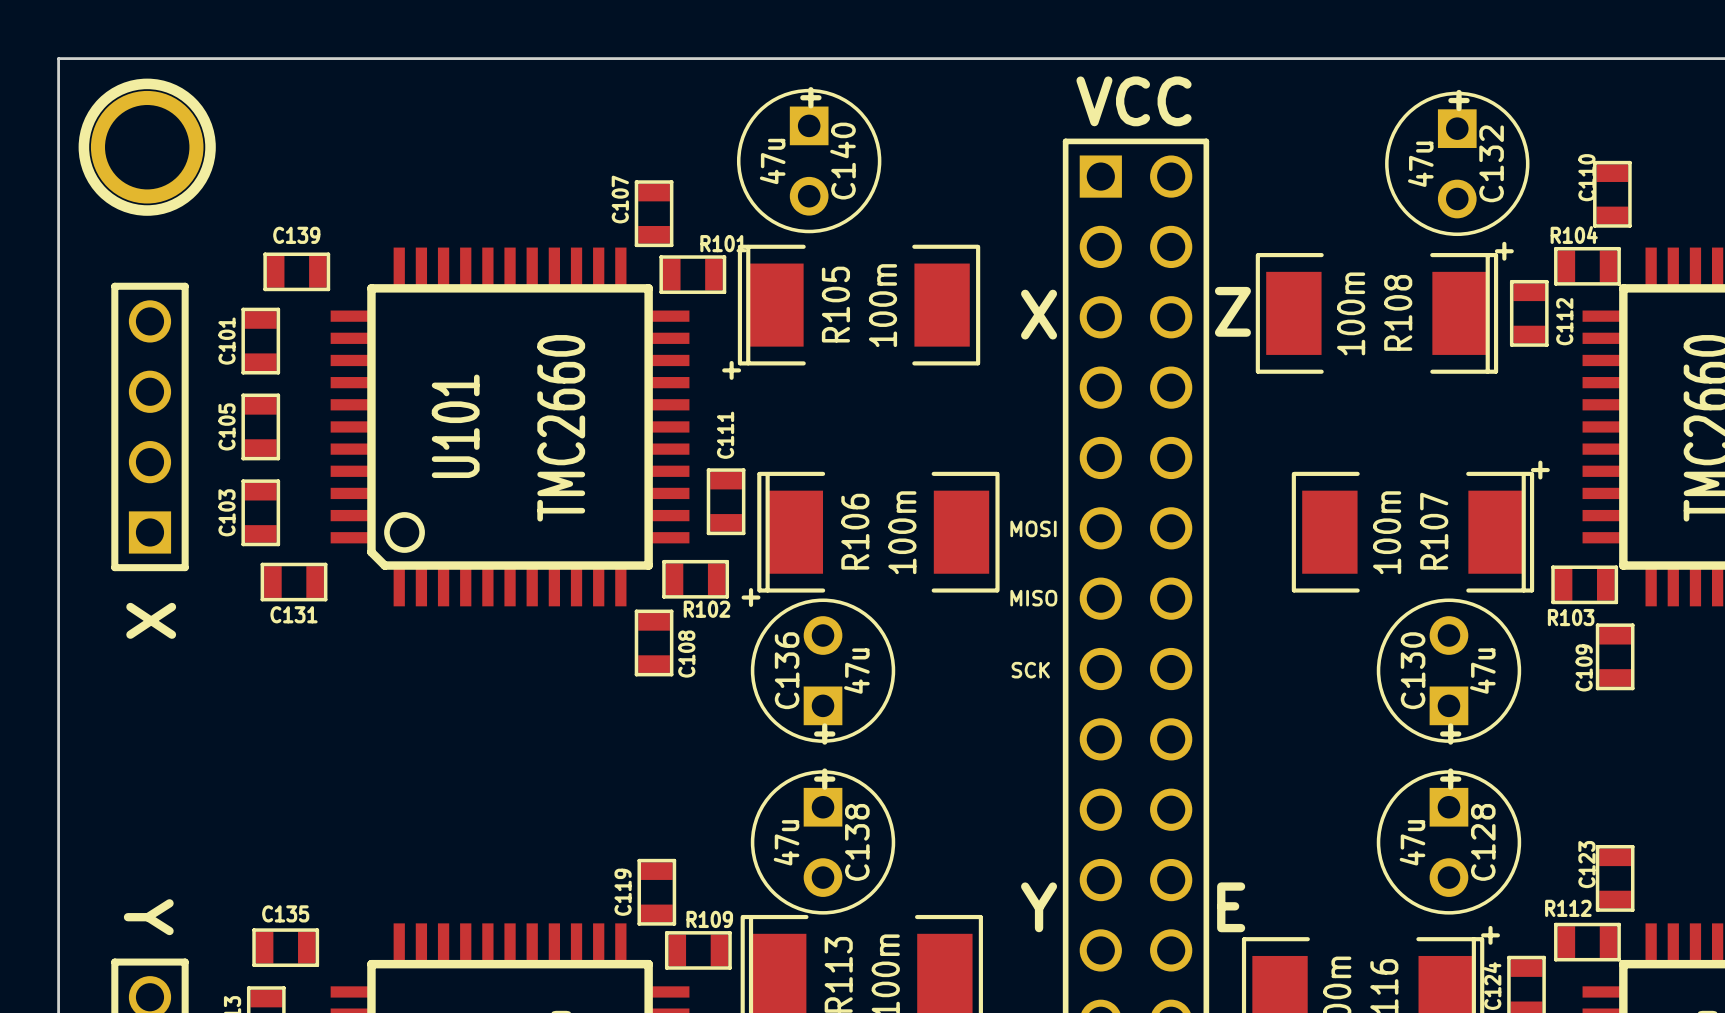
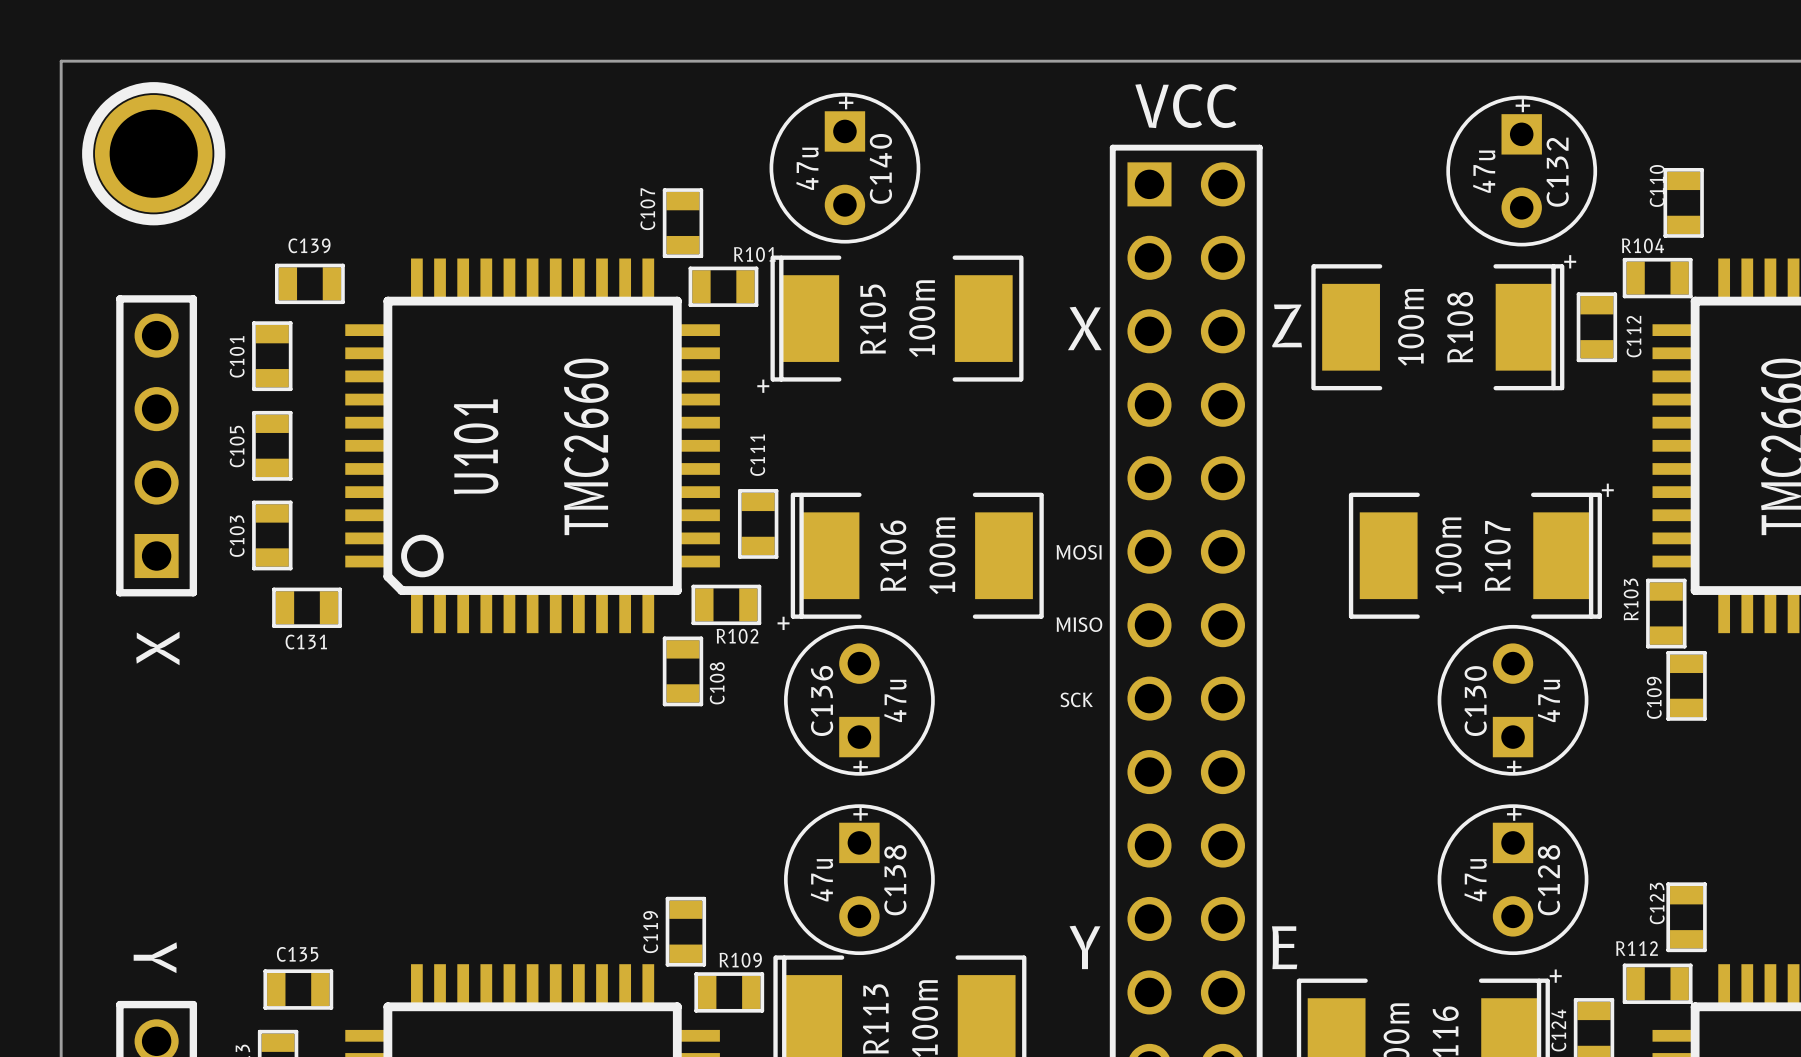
R103 rotation: 0° (1584, 584) -> 90° clockwise (1666, 613)

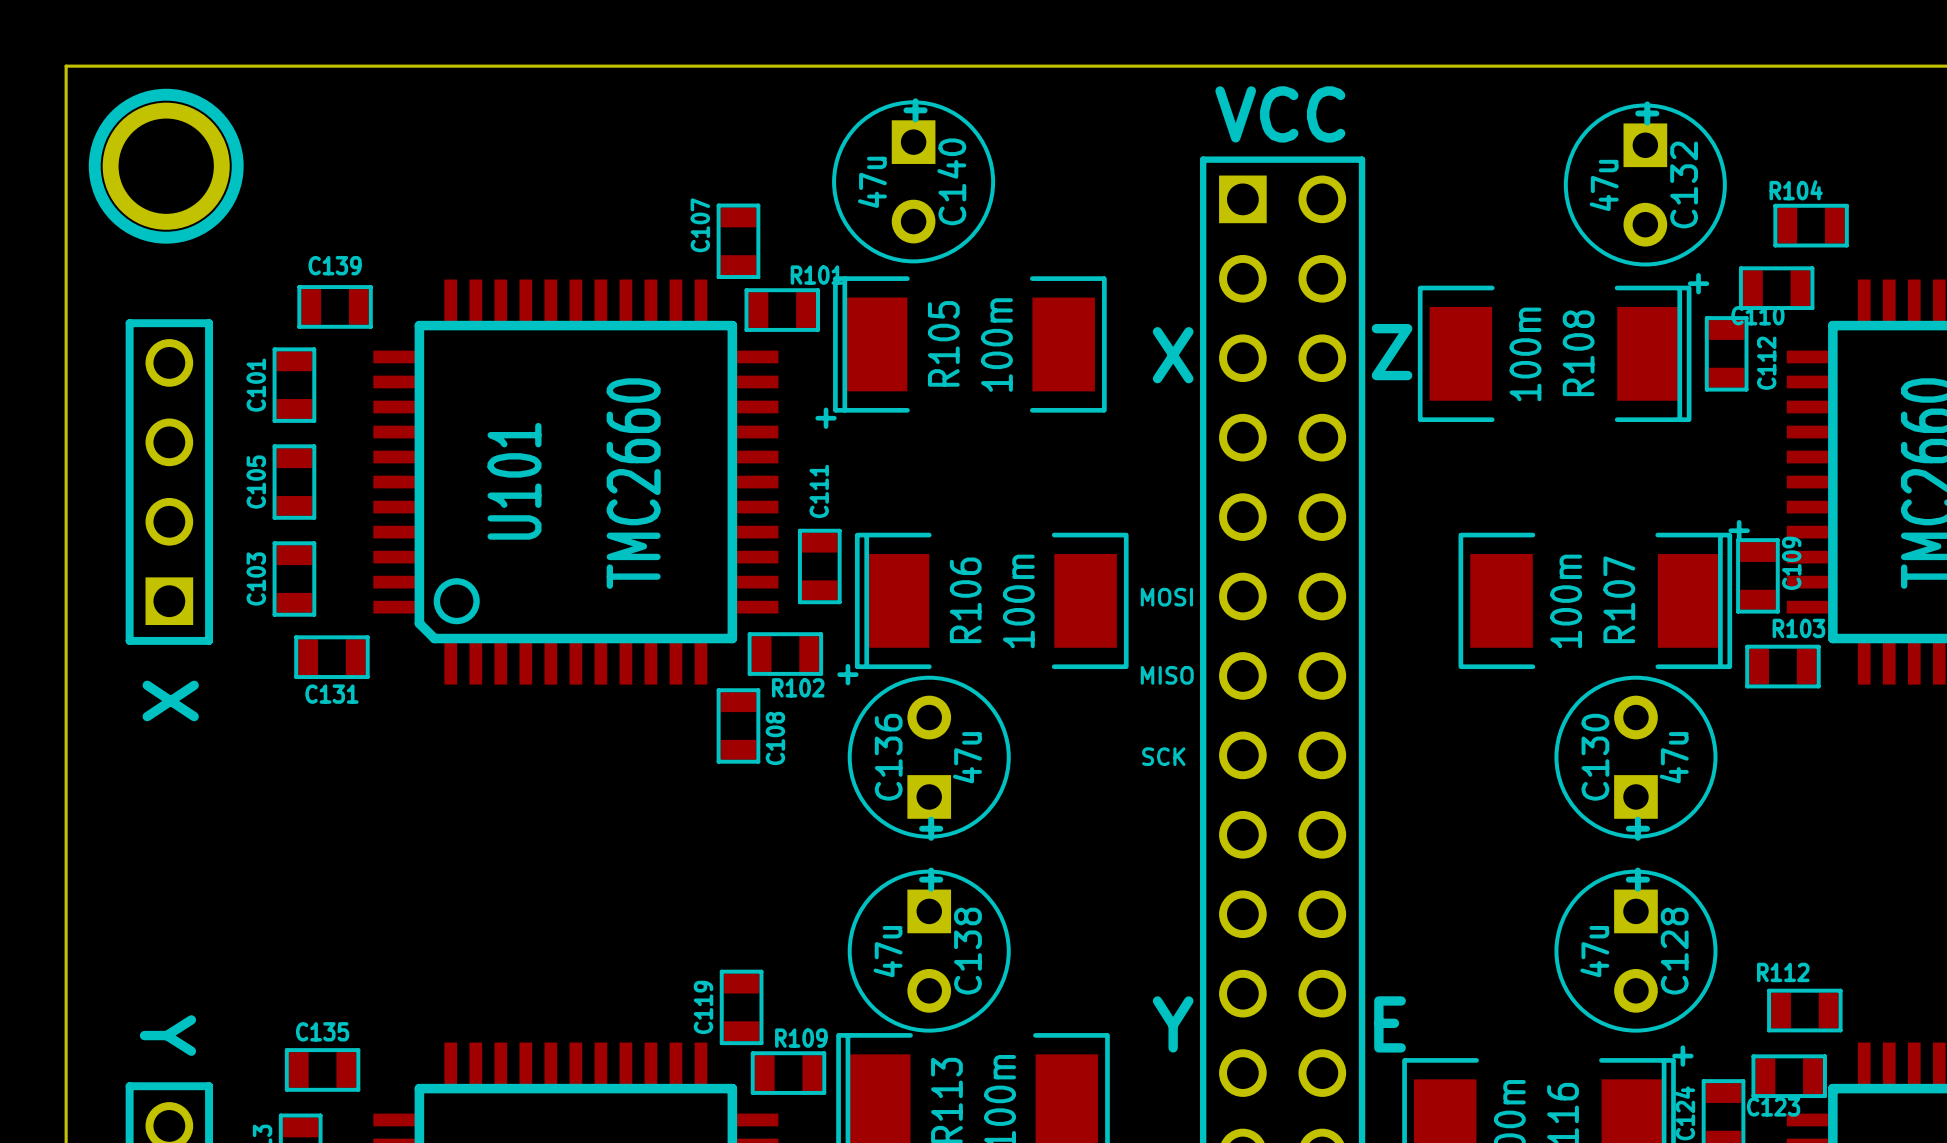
C110 rotation: 0° (1683, 202) -> 90° clockwise (1776, 288)
C110 position: (1683, 202) -> (1776, 288)
R104 position: (1657, 278) -> (1811, 225)
R103 rotation: 0° (1666, 613) -> 90° clockwise (1782, 666)
C109 position: (1686, 685) -> (1757, 575)
C109 name position: C109 (1654, 697) -> C109 (1791, 563)
C123 rotation: 0° (1686, 917) -> 90° clockwise (1789, 1076)
C123 position: (1686, 917) -> (1789, 1076)
R112 position: (1657, 983) -> (1804, 1010)

